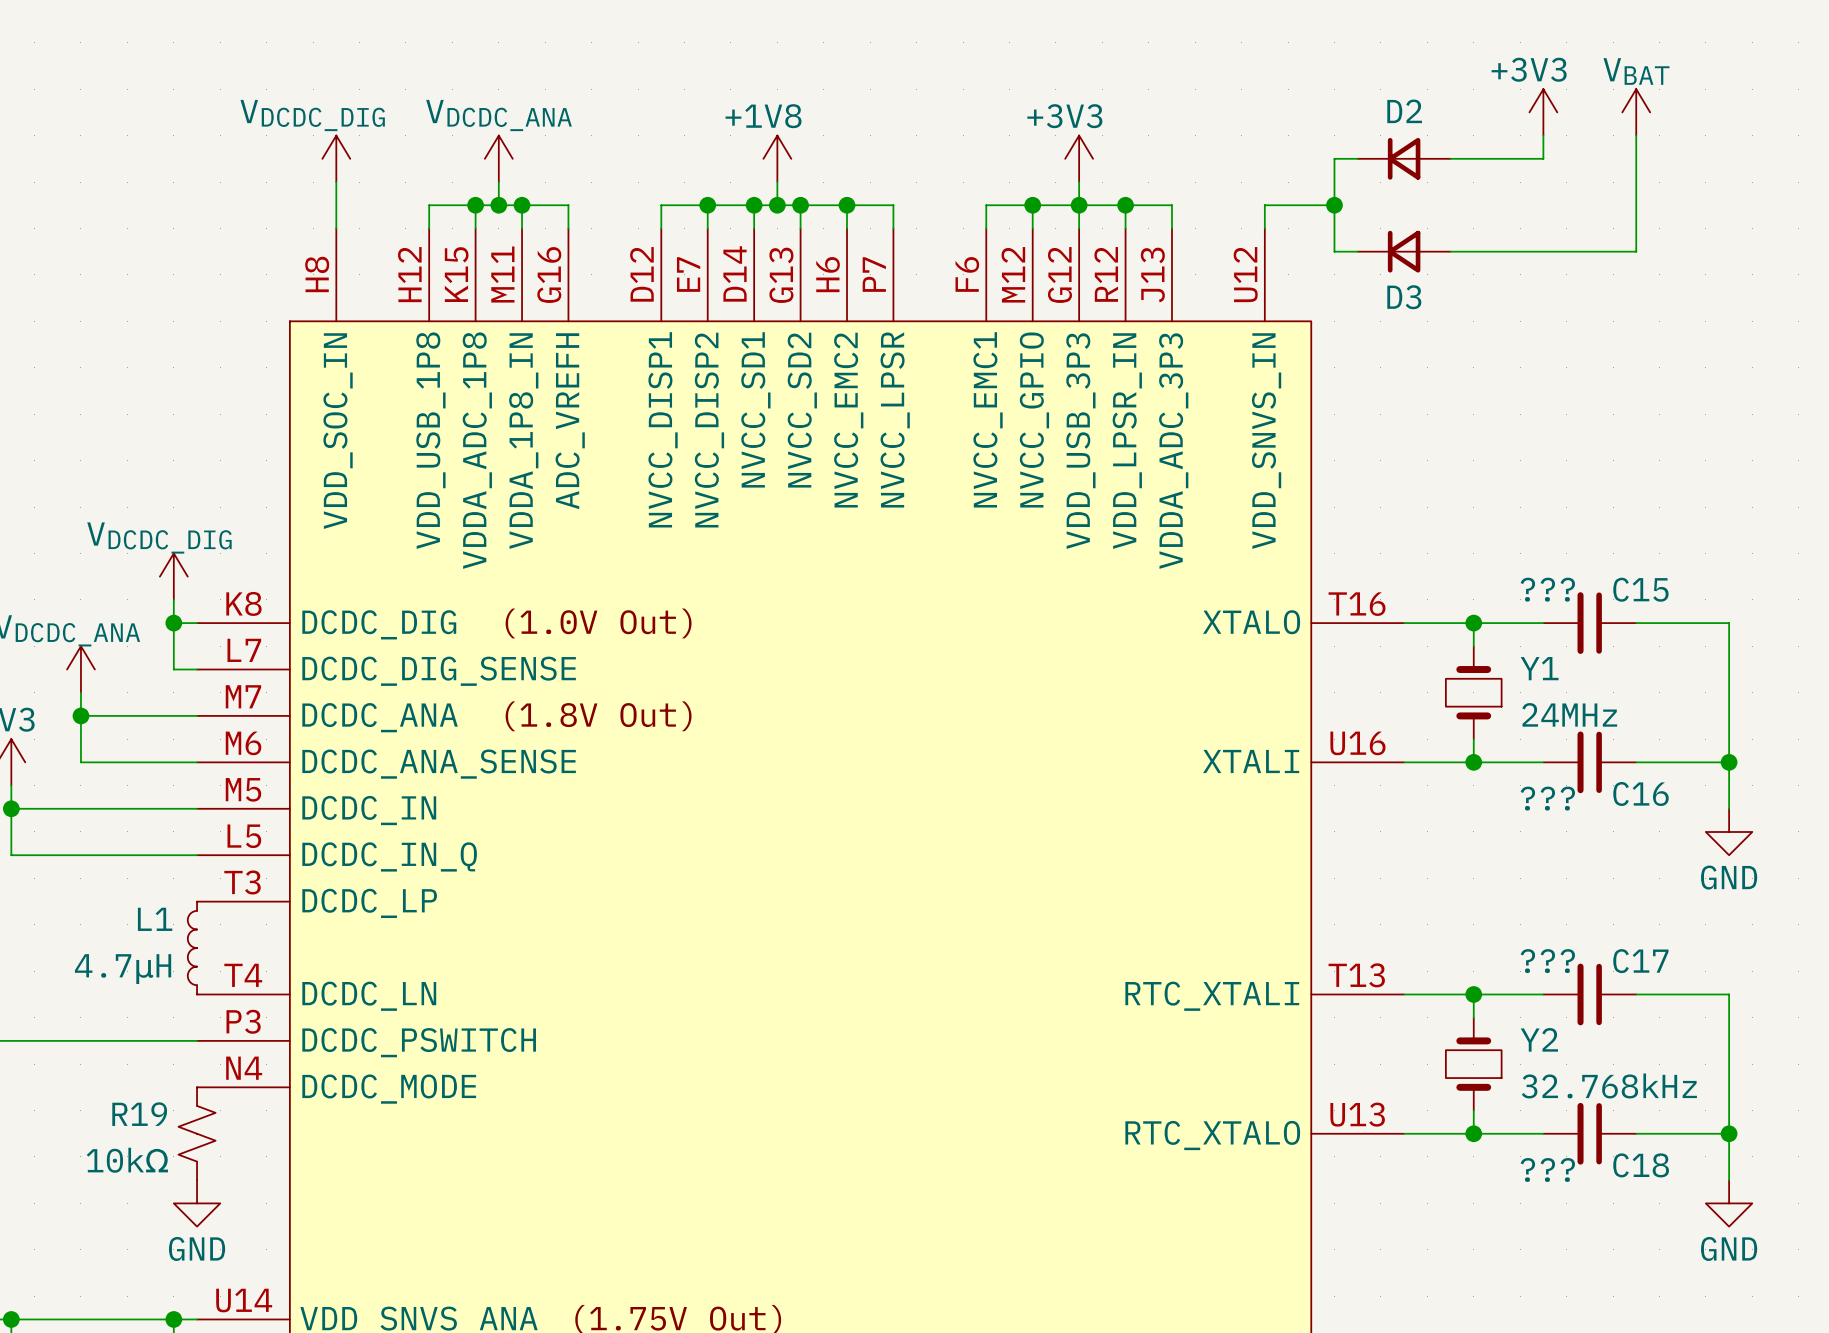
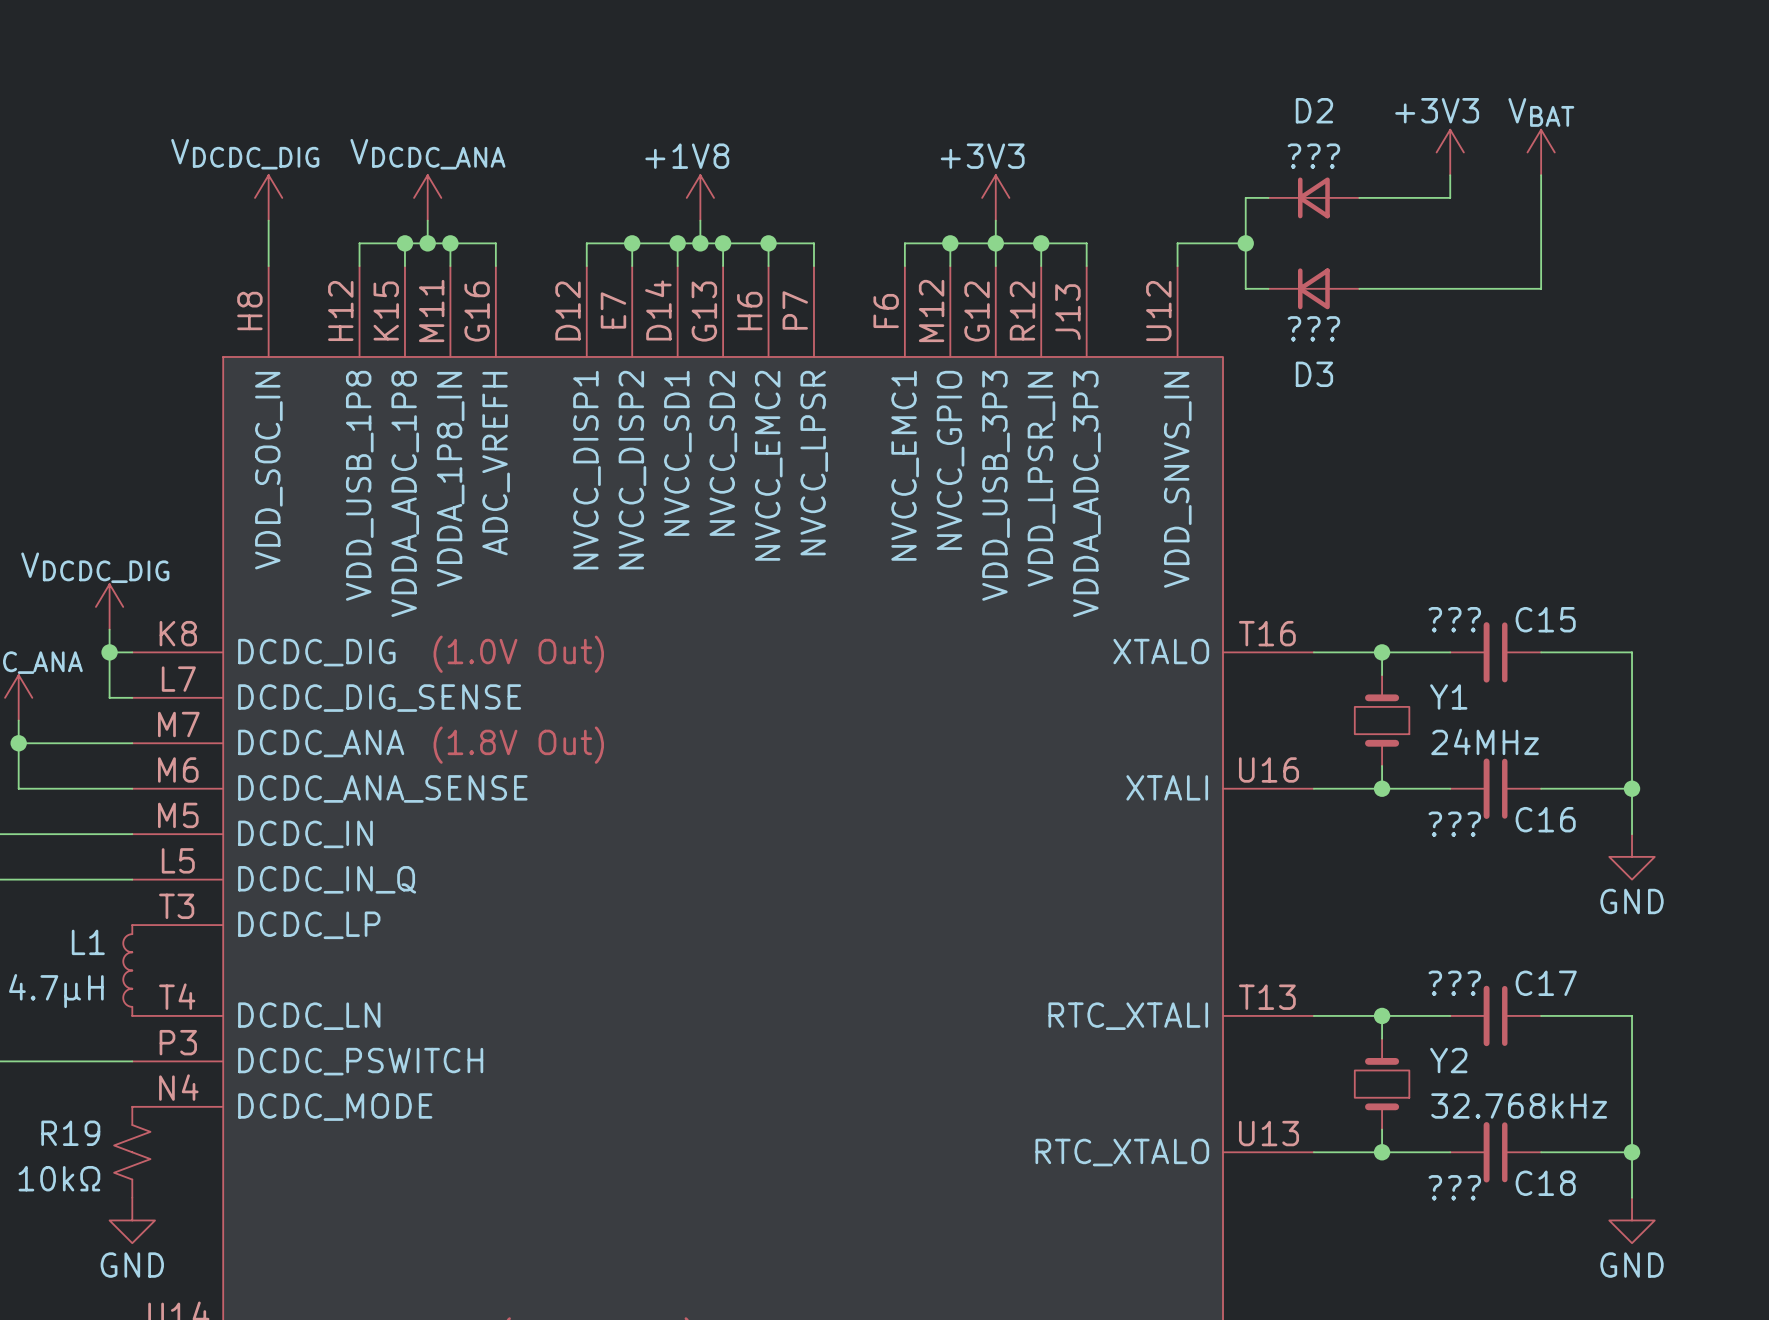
D2 name position: D2 (1404, 111) -> D2 (1314, 110)
D2 value: none -> ??? (1313, 156)
D3 value: none -> ??? (1313, 328)
D3 name position: D3 (1404, 297) -> D3 (1314, 374)

